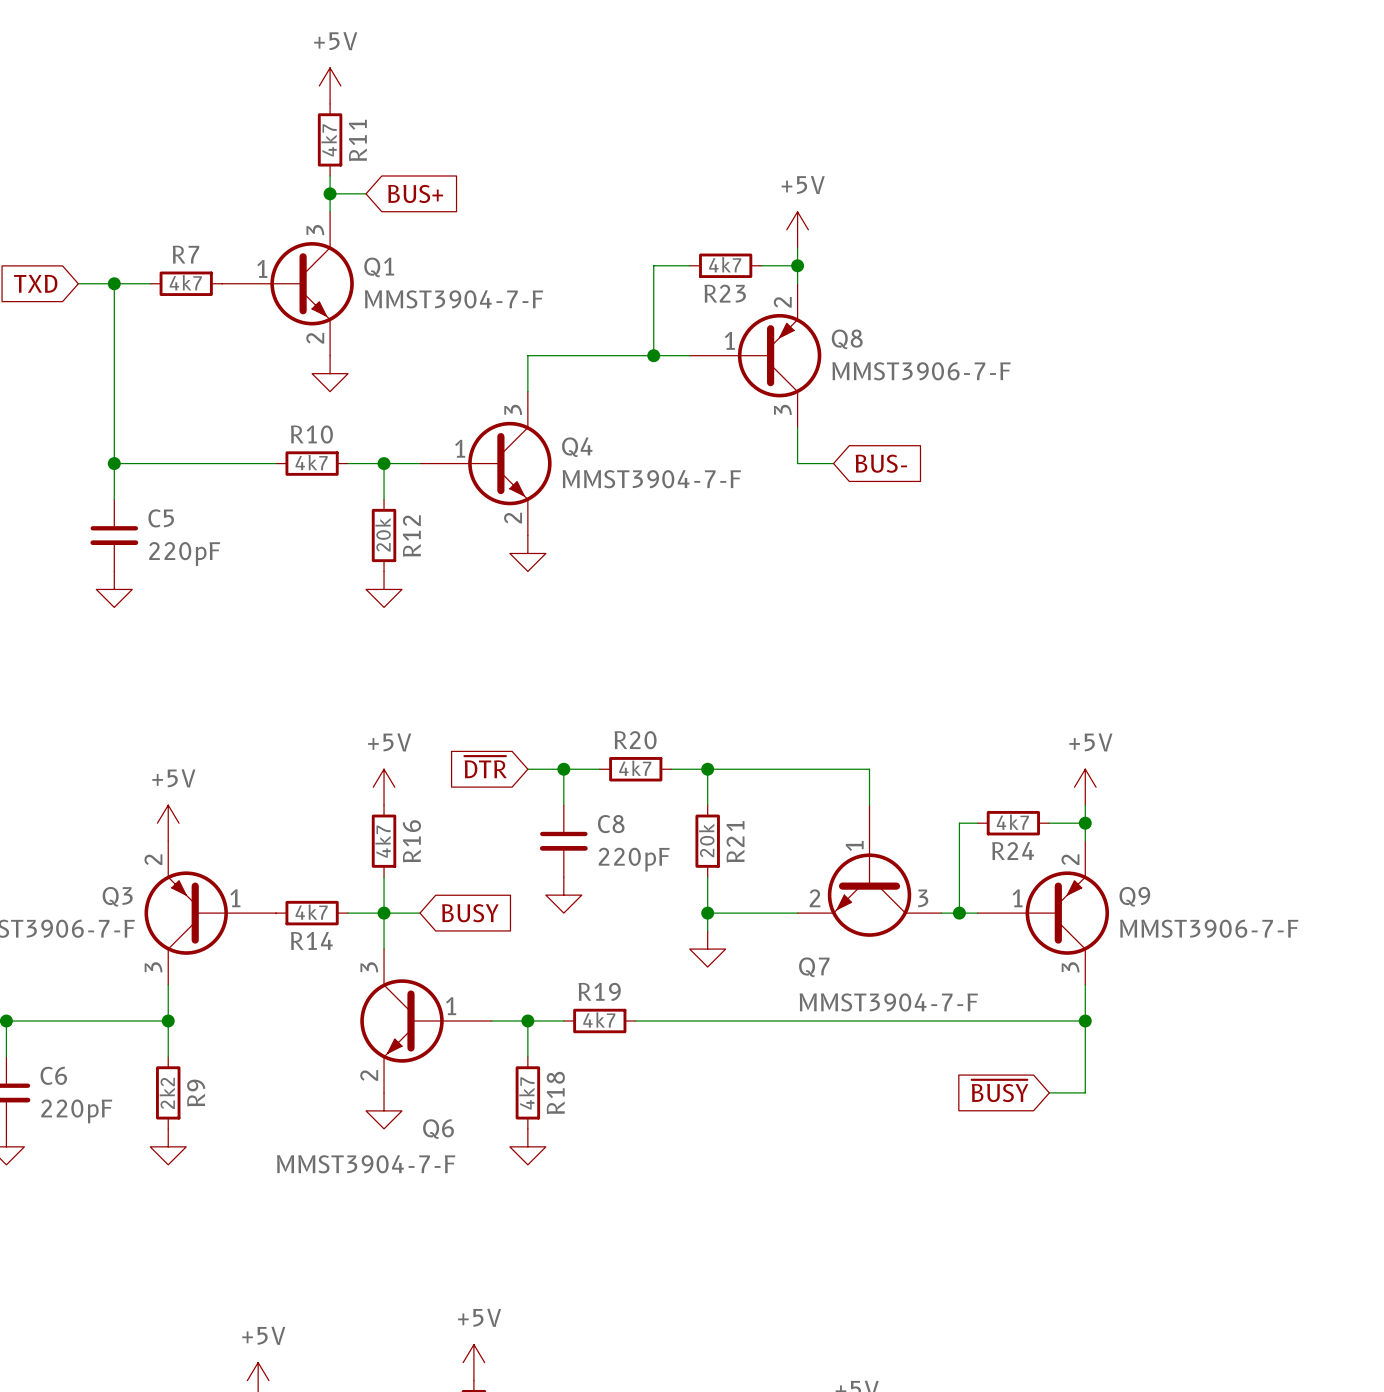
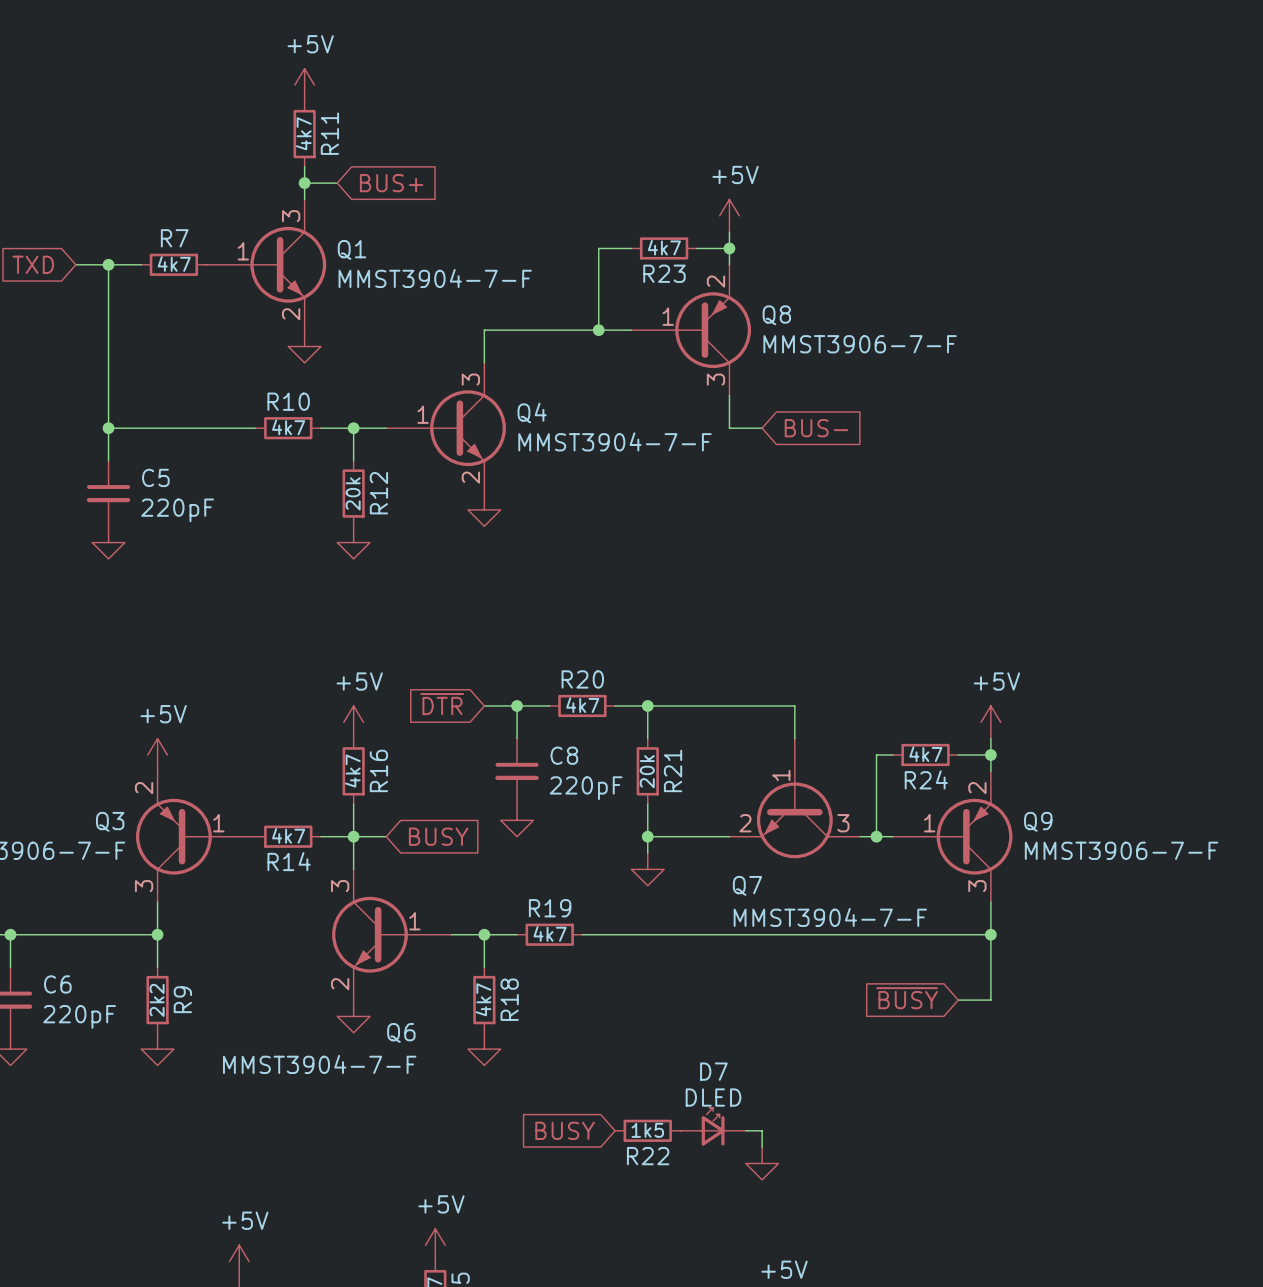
D7: none -> DLED (713, 1126)
global label: none -> BUSY (565, 1130)
R22: none -> 1k5 (647, 1130)
wire: none -> (745, 1130) (762, 1130) (762, 1147)
power symbol: none -> (762, 1163)

